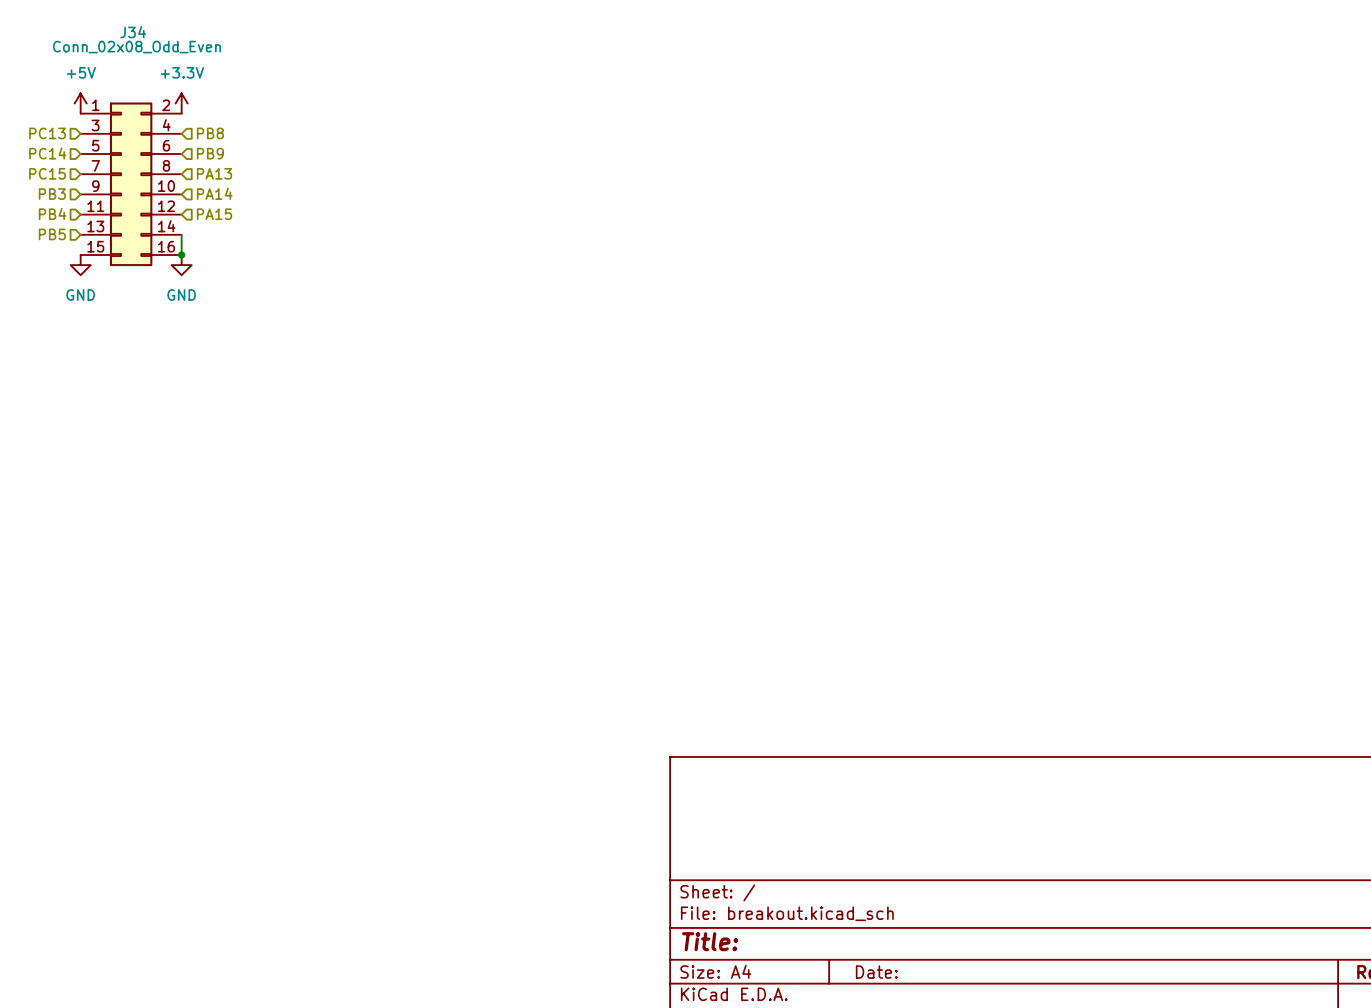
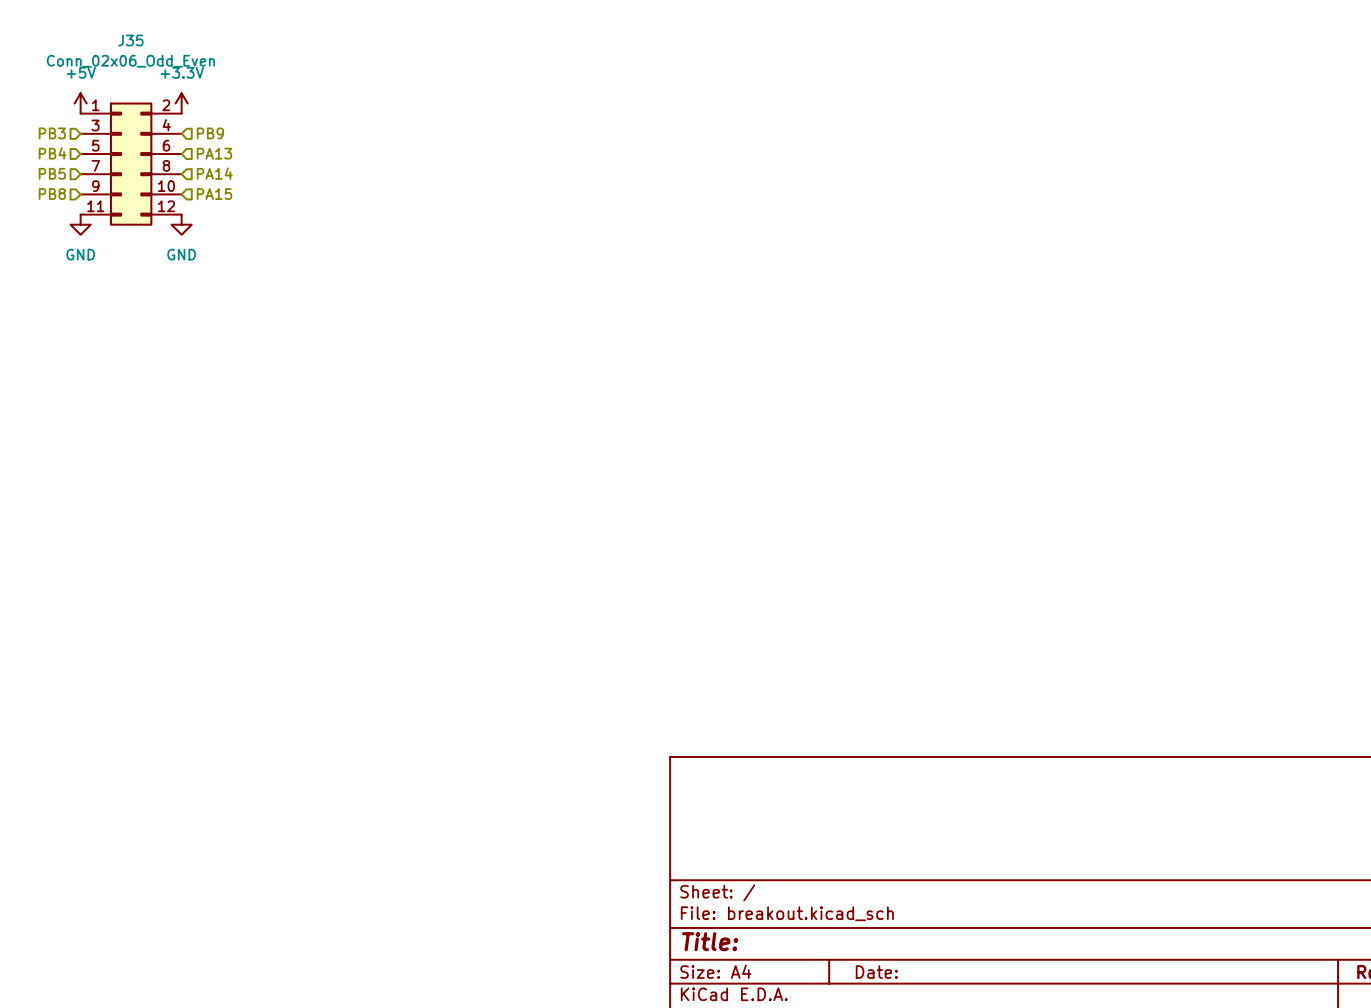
hierarchical label: PC13 (47, 133) -> PB3 (52, 133)
hierarchical label: PB8 (210, 133) -> PB9 (210, 133)
hierarchical label: PC14 (47, 153) -> PB4 (52, 153)
hierarchical label: PB9 (210, 153) -> PA13 (214, 153)
J35: none -> Conn_02x06_Odd_Even (131, 164)
hierarchical label: PC15 (47, 173) -> PB5 (52, 173)
hierarchical label: PA13 (214, 173) -> PA14 (214, 173)
J34: Conn_02x08_Odd_Even (131, 184) -> none
hierarchical label: PA14 (214, 193) -> PA15 (214, 194)
hierarchical label: PB3 (52, 194) -> PB8 (52, 194)
hierarchical label: PB4 (52, 213) -> none
hierarchical label: PA15 (214, 214) -> none
hierarchical label: PB5 (52, 234) -> none
wire: (181, 234) (181, 255) -> none
junction: (181, 255) -> none
power symbol position: GND (80, 265) -> GND (80, 224)
power symbol position: GND (181, 265) -> GND (181, 224)

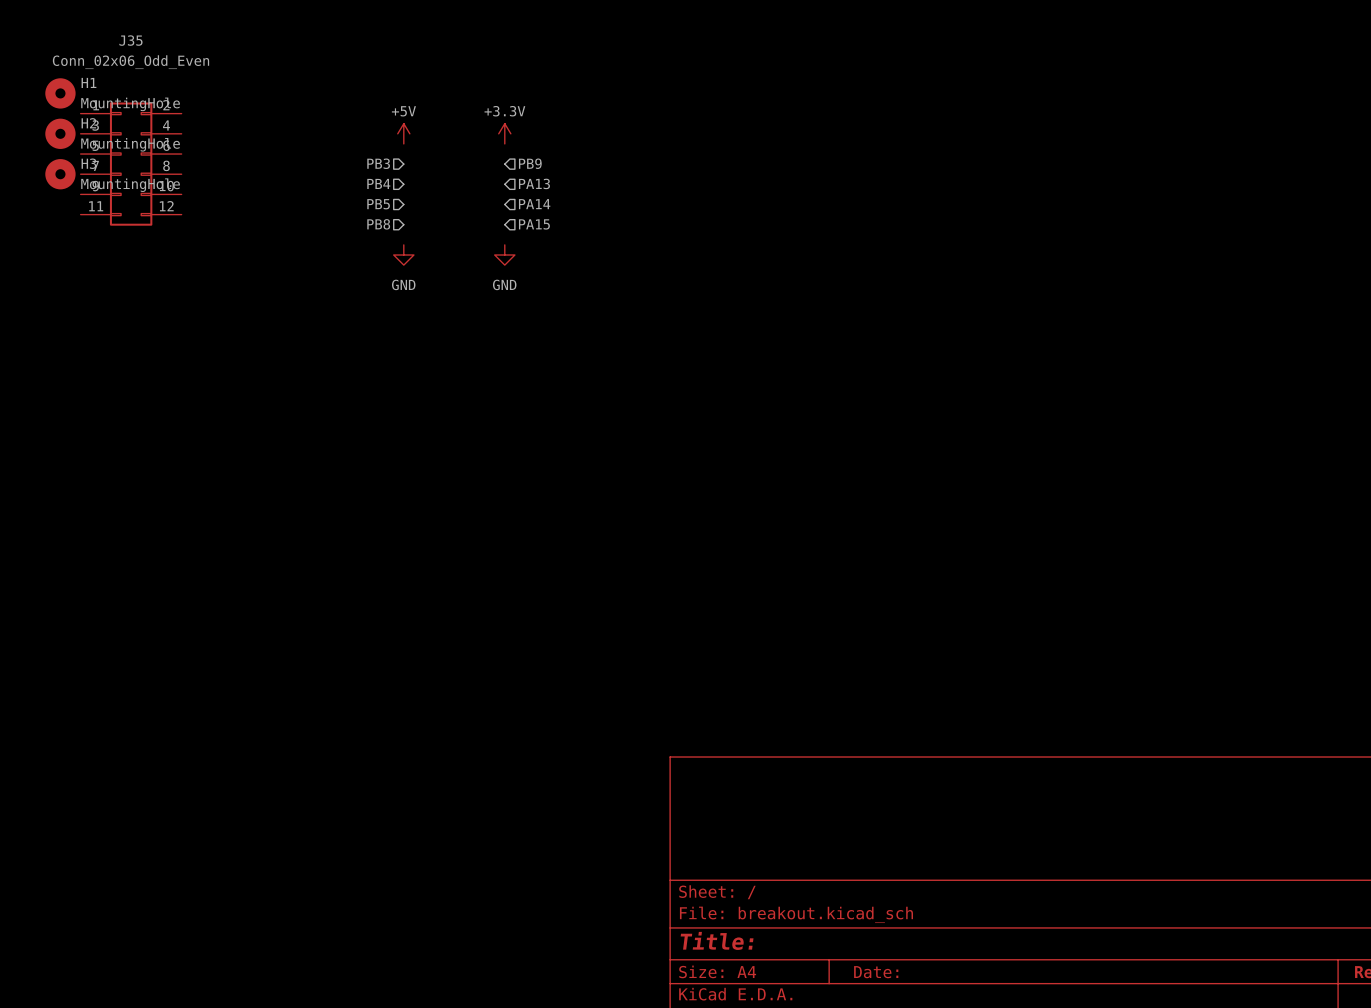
H1: none -> MountingHole (60, 93)
power symbol: +5V (80, 103) -> none
power symbol: +3.3V (181, 103) -> none
hierarchical label: PB3 (52, 133) -> none
H2: none -> MountingHole (60, 133)
hierarchical label: PB9 (210, 133) -> none
power symbol: none -> +5V (403, 133)
power symbol: none -> +3.3V (504, 133)
hierarchical label: PB4 (52, 153) -> none
hierarchical label: PA13 (214, 153) -> none
hierarchical label: none -> PB3 (378, 163)
hierarchical label: none -> PB9 (530, 163)
hierarchical label: PB5 (52, 173) -> none
hierarchical label: PA14 (214, 173) -> none
H3: none -> MountingHole (60, 174)
hierarchical label: none -> PB4 (378, 183)
hierarchical label: none -> PA13 (534, 183)
hierarchical label: PB8 (52, 194) -> none
hierarchical label: PA15 (214, 194) -> none
hierarchical label: none -> PA14 (534, 204)
hierarchical label: none -> PB5 (378, 204)
power symbol: GND (80, 224) -> none
power symbol: GND (181, 224) -> none
hierarchical label: none -> PB8 (378, 224)
hierarchical label: none -> PA15 (534, 224)
power symbol: none -> GND (403, 255)
power symbol: none -> GND (504, 255)

